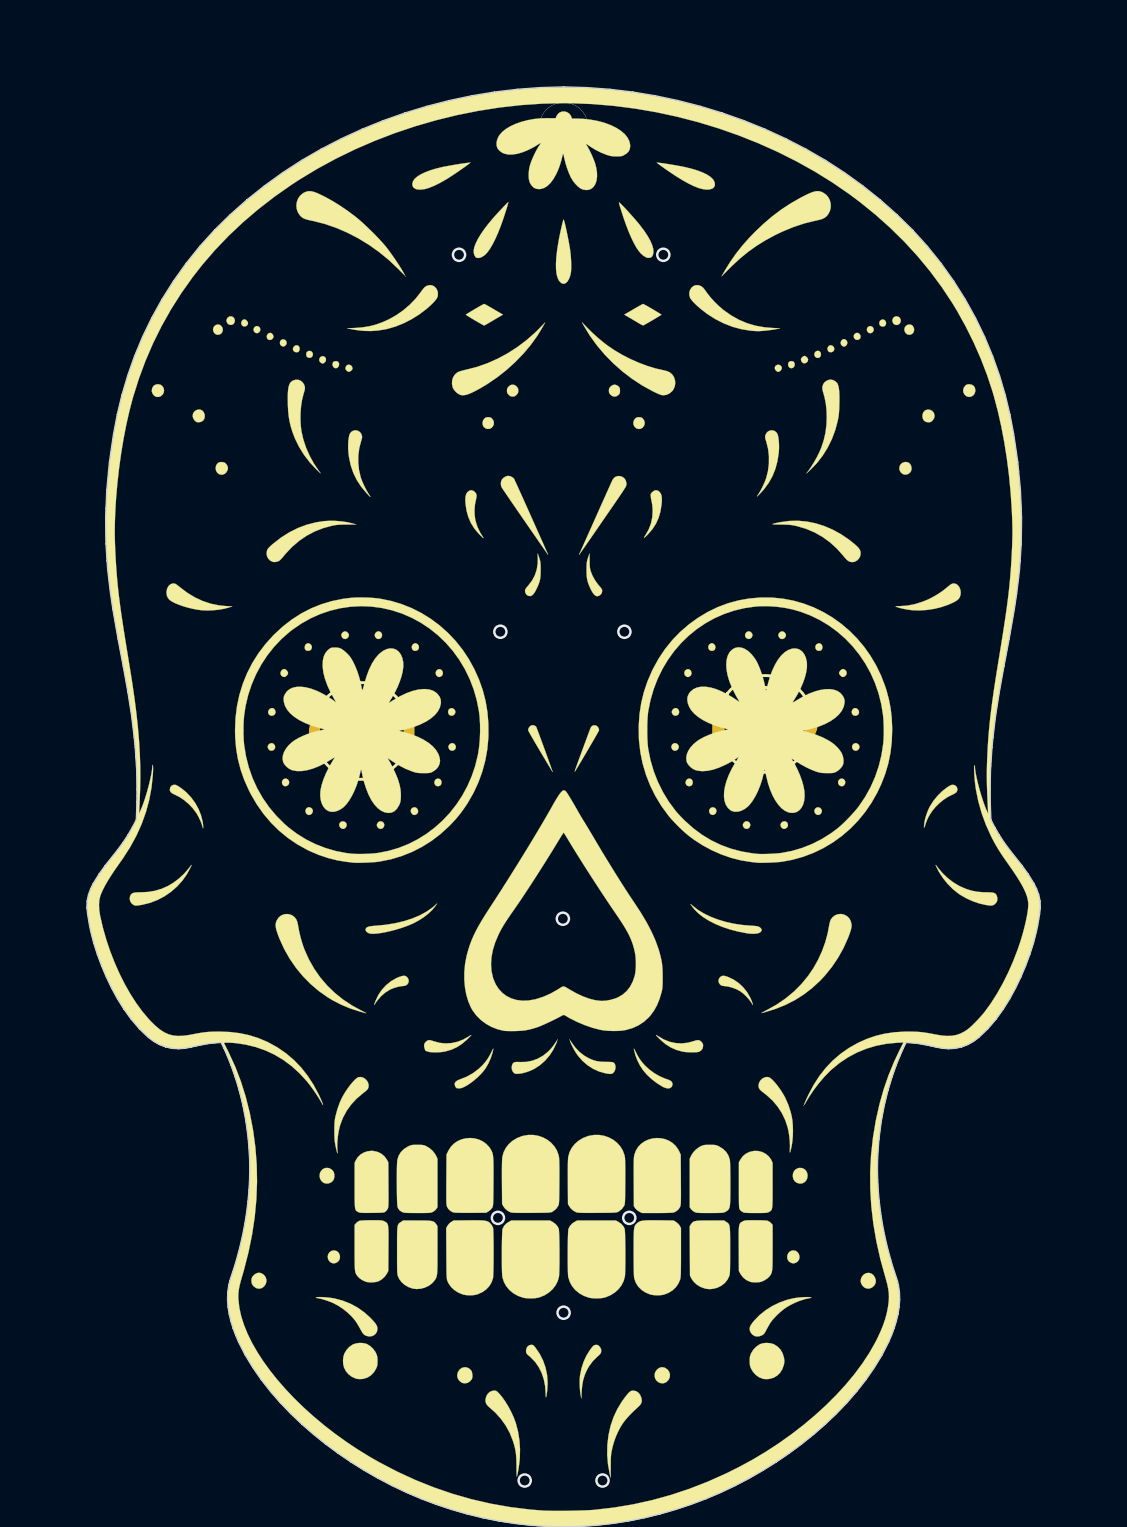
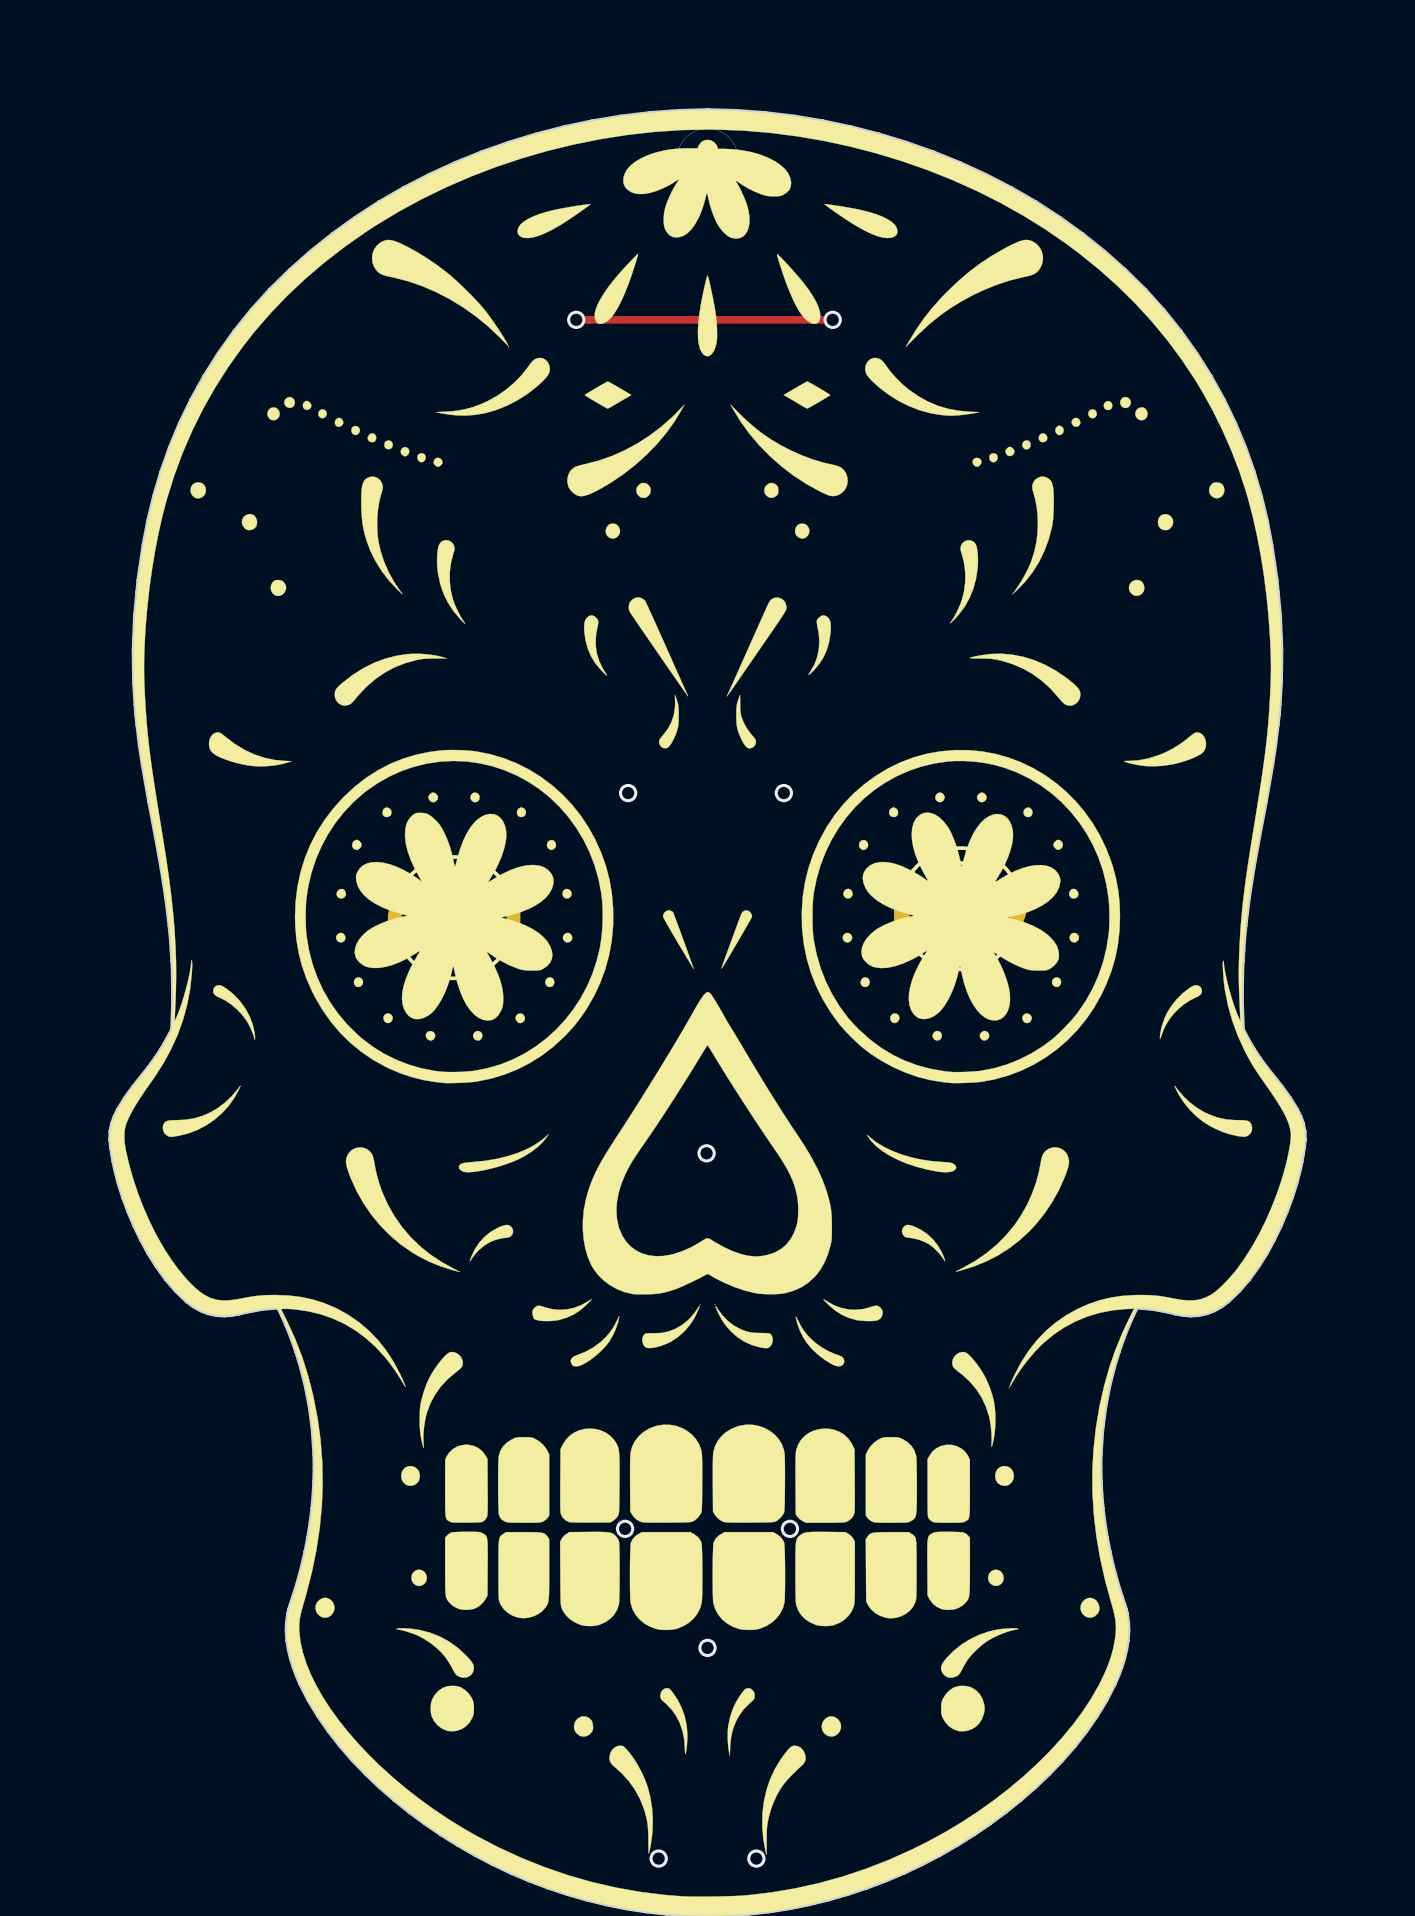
track: none -> (576, 319) (832, 319)

